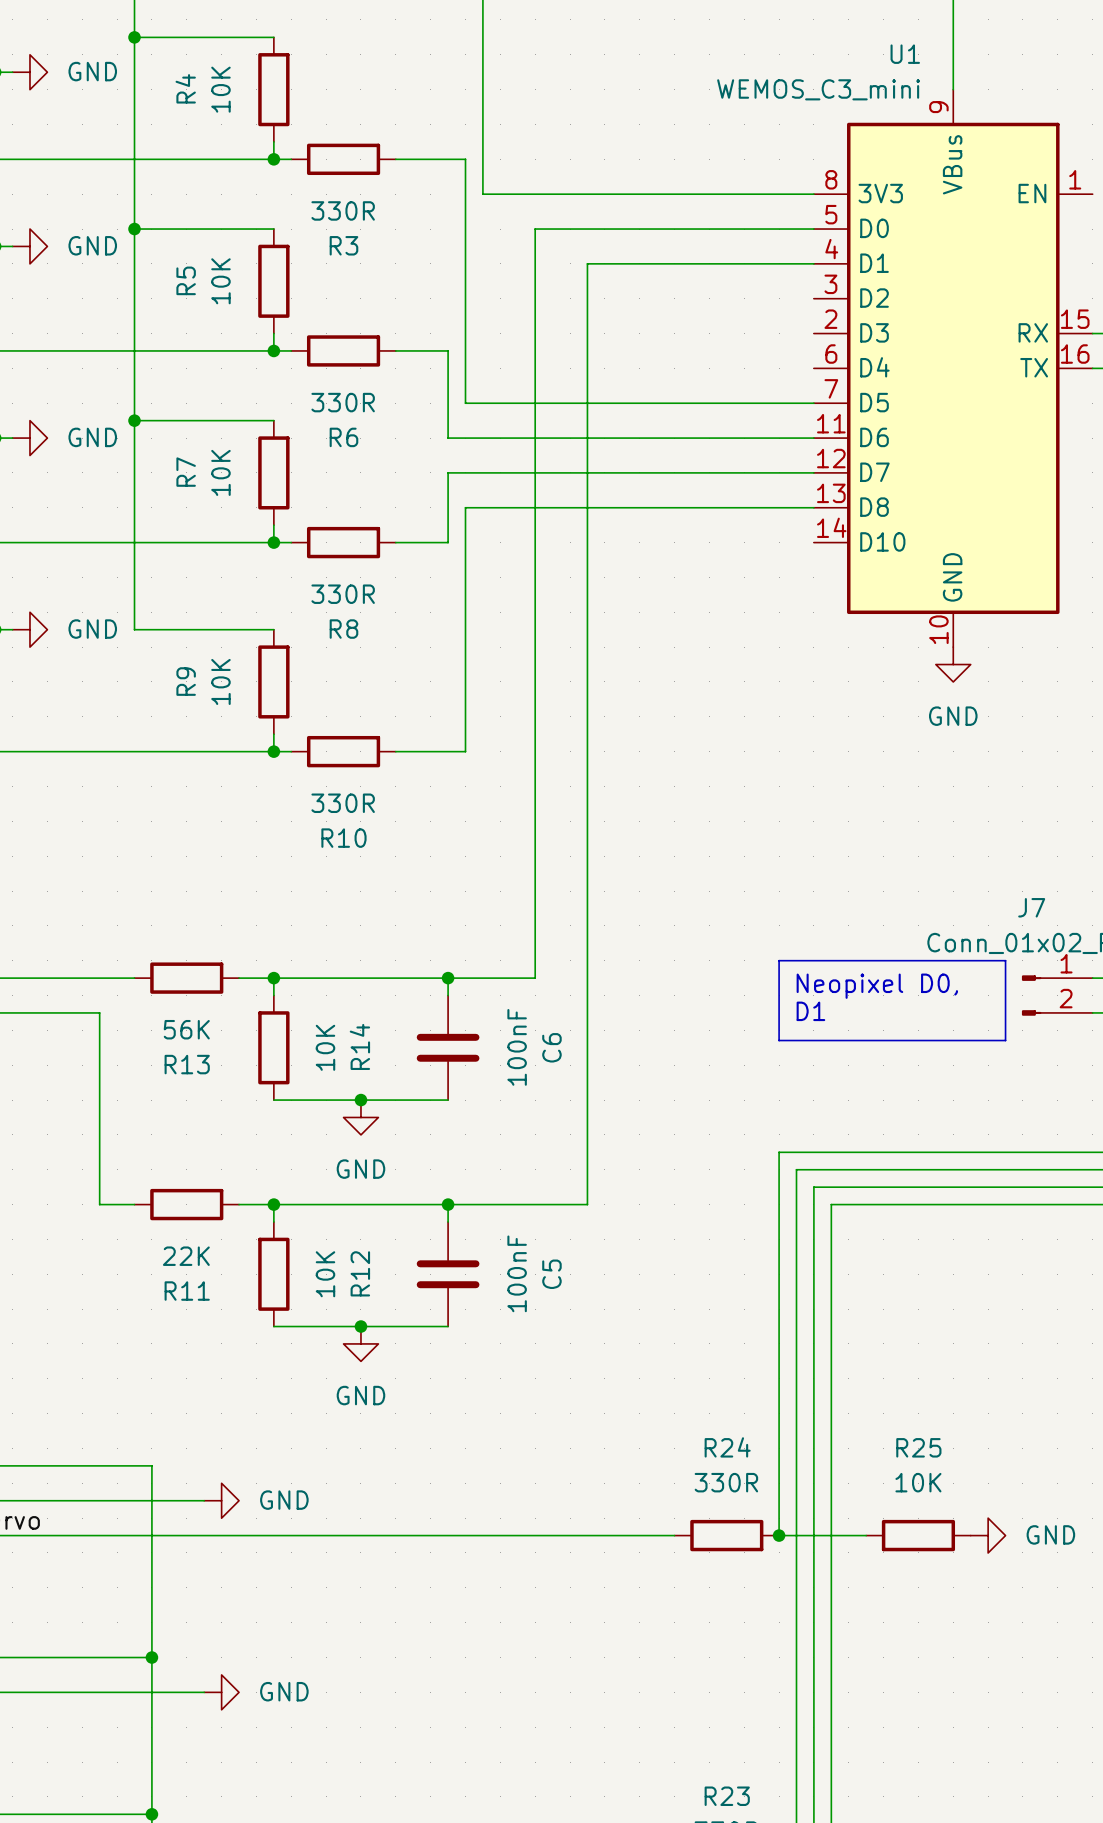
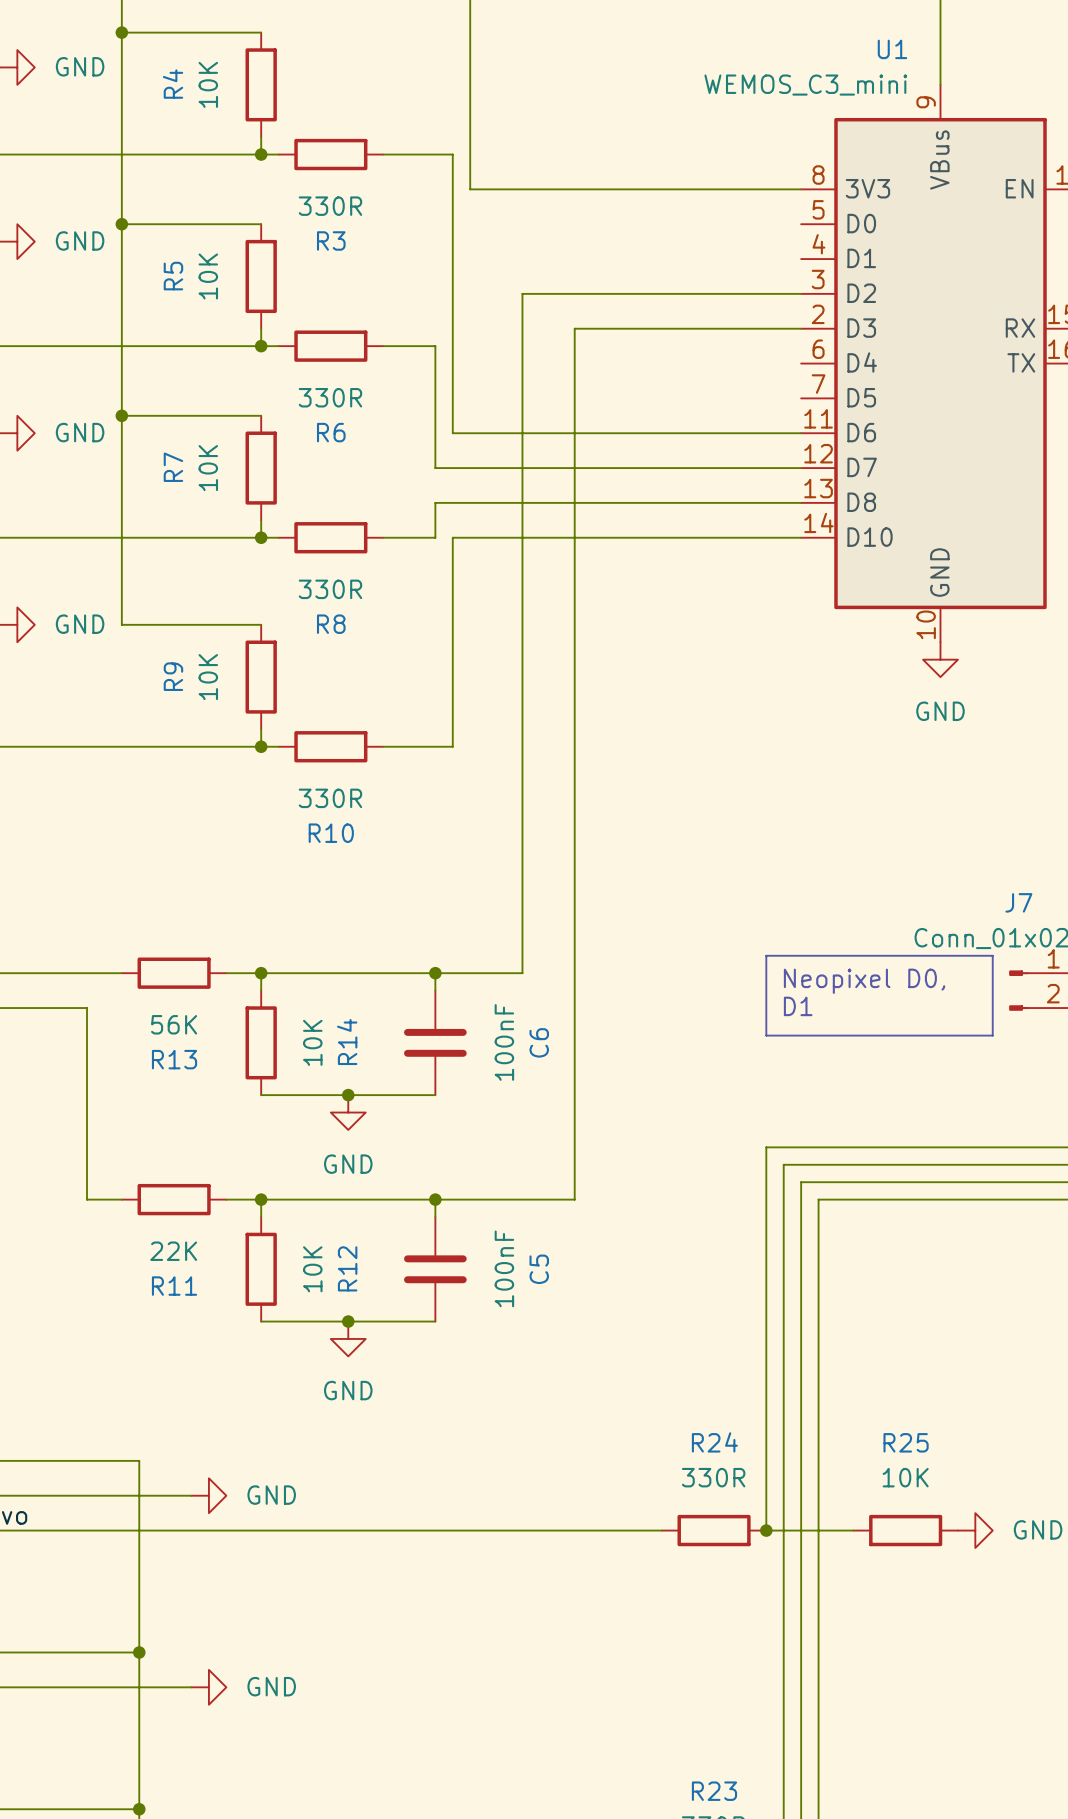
wire: (813, 229) (535, 229) (535, 298) -> (801, 293) (522, 293)
wire: (813, 263) (587, 263) (587, 333) -> (801, 328) (574, 328)
wire: (465, 403) (813, 403) -> none
wire: (448, 438) (465, 438) -> (452, 398) (452, 433)
wire: none -> (435, 433) (435, 468)
wire: (448, 472) (448, 507) -> (452, 502) (435, 502)
wire: (465, 507) (465, 542) -> (801, 537) (452, 537)

